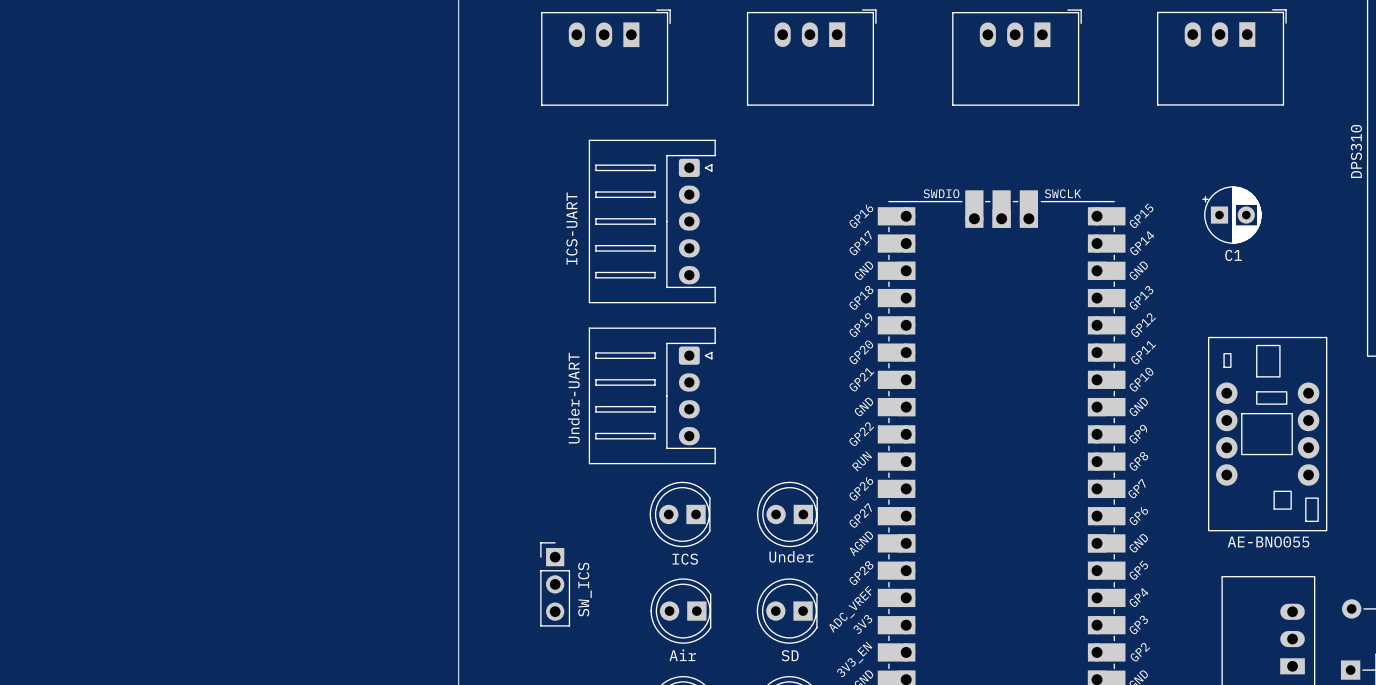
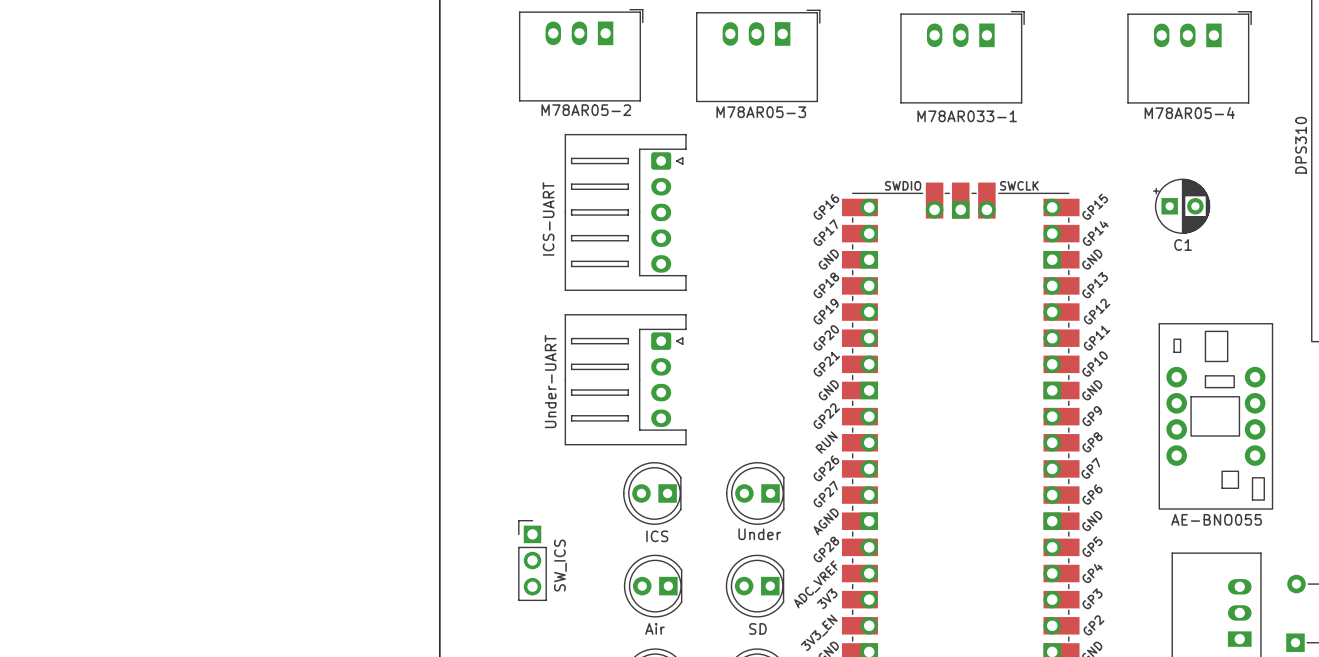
part: (811, 57) -> none
part: (1016, 57) -> none
part: (1221, 57) -> none
M78AR05-3: none -> (758, 55)
M78AR033-1: none -> (962, 57)
M78AR05-4: none -> (1189, 57)
M78AR05-2 name: none -> M78AR05-2 (586, 110)

